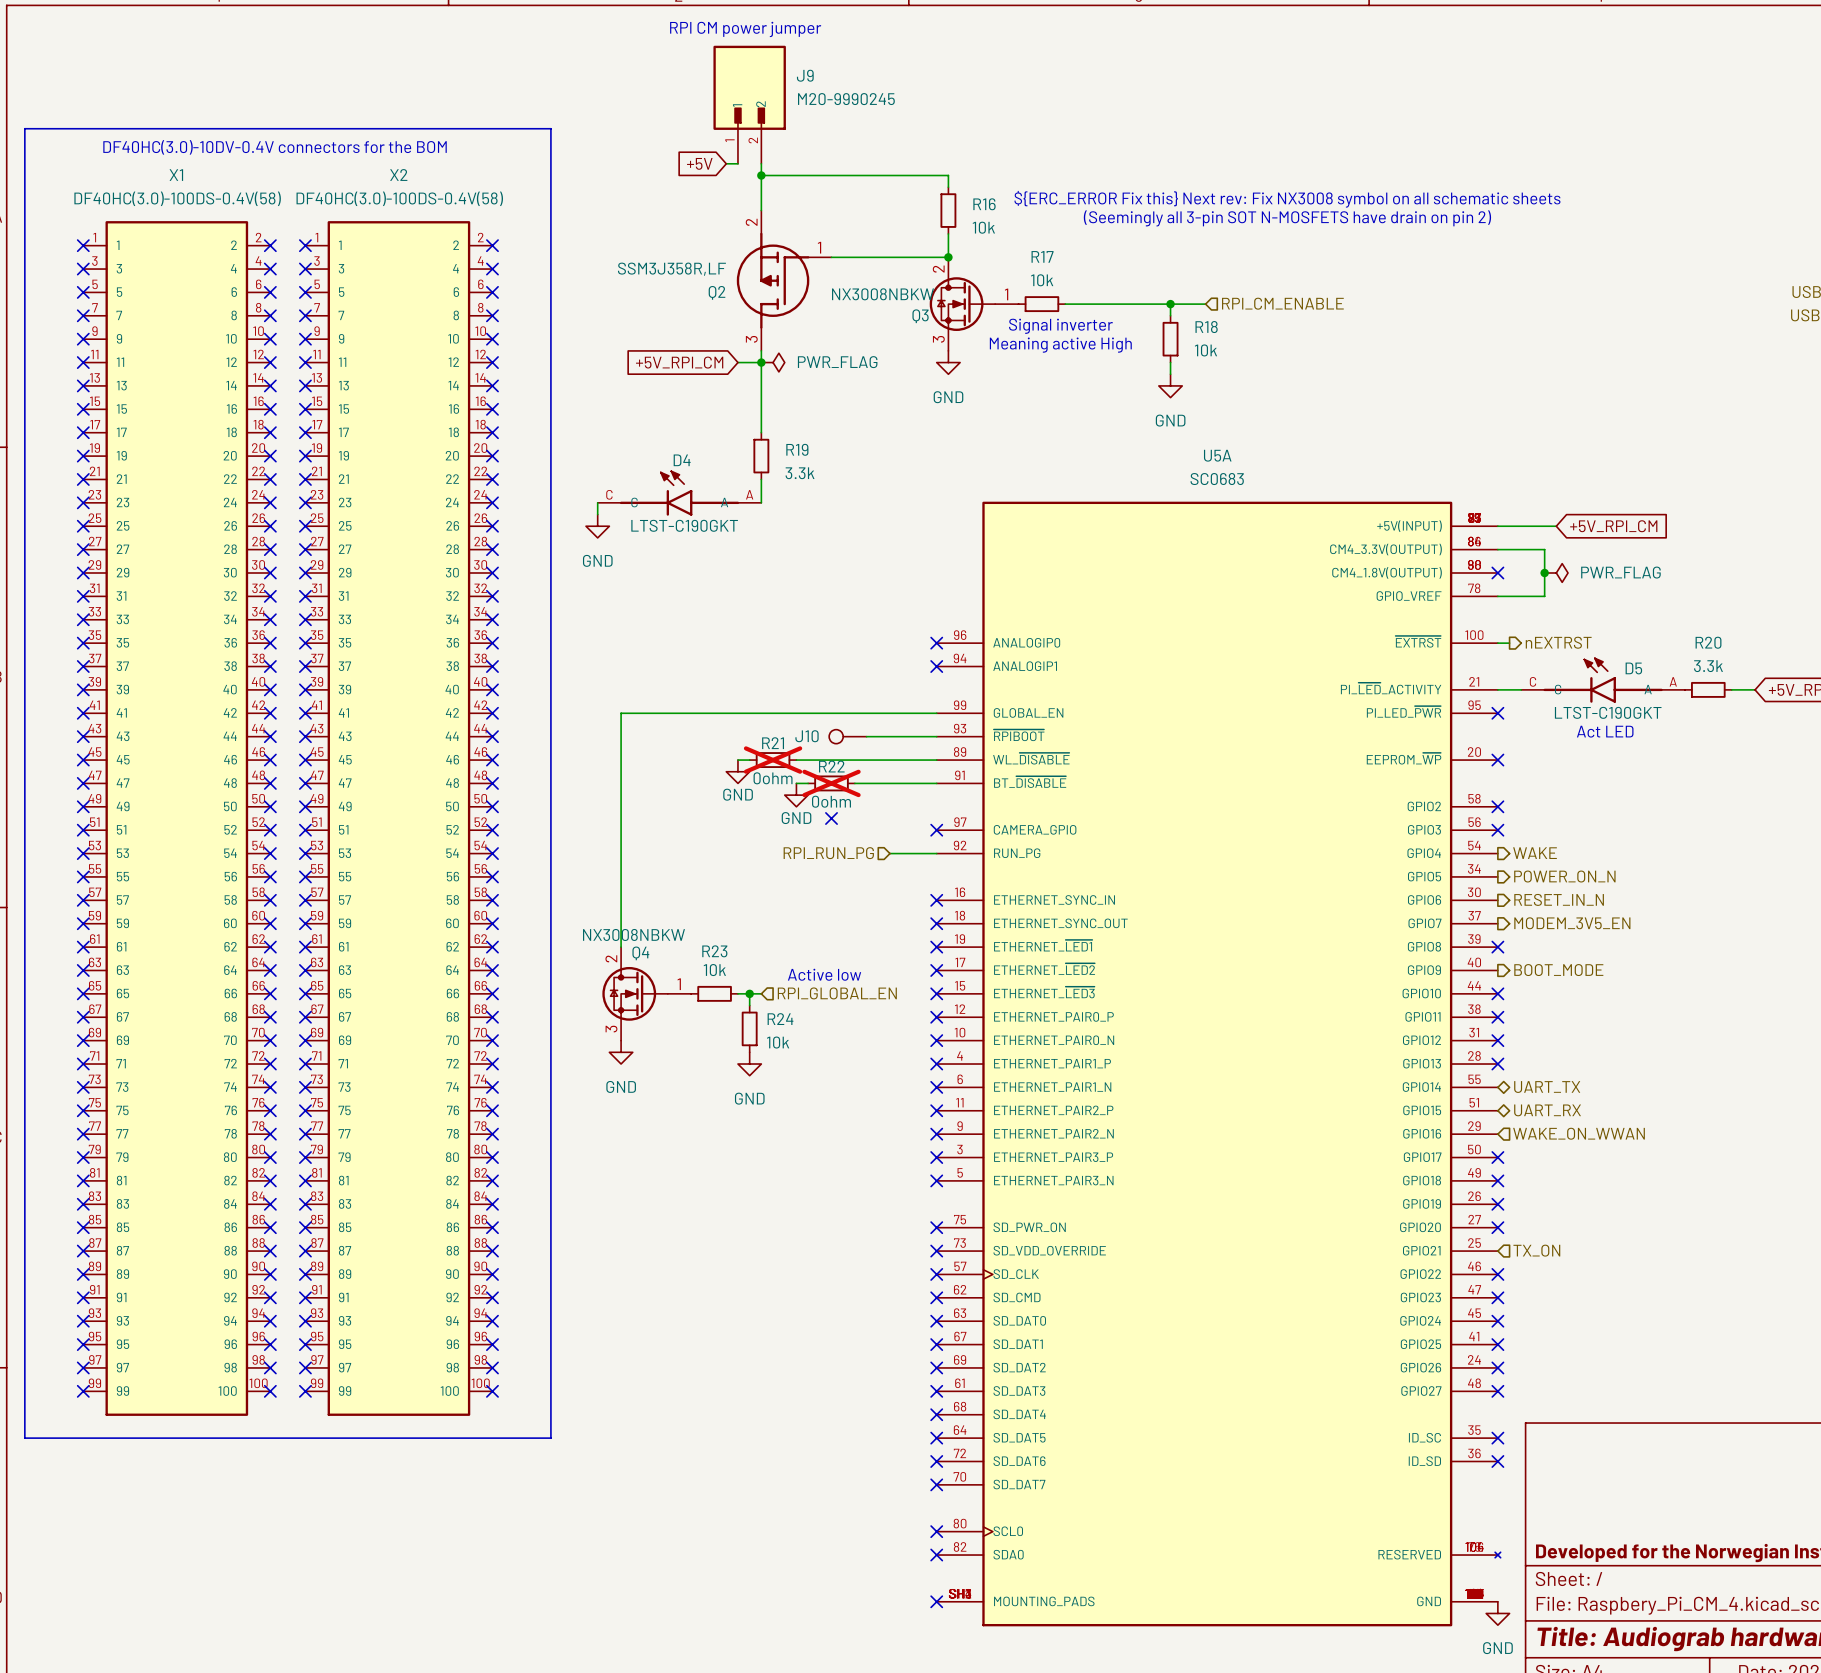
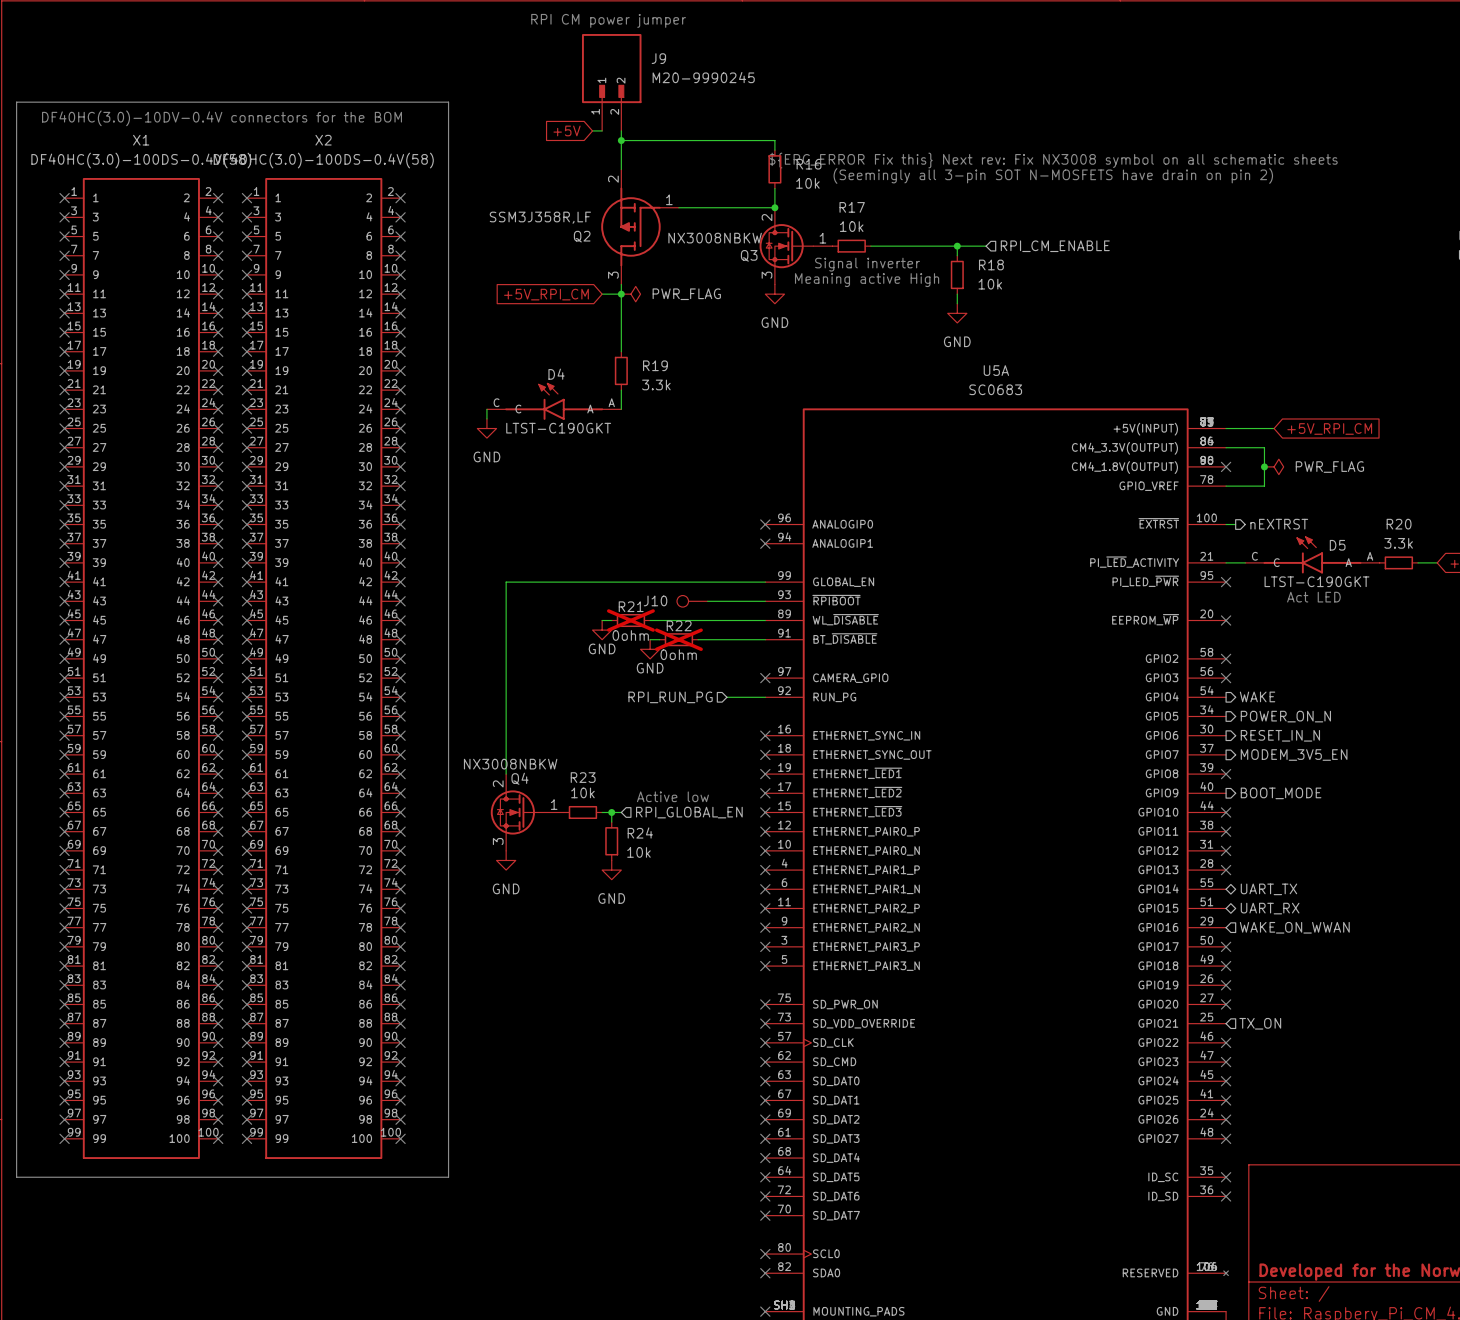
no-connect mark: (831, 818) -> none

